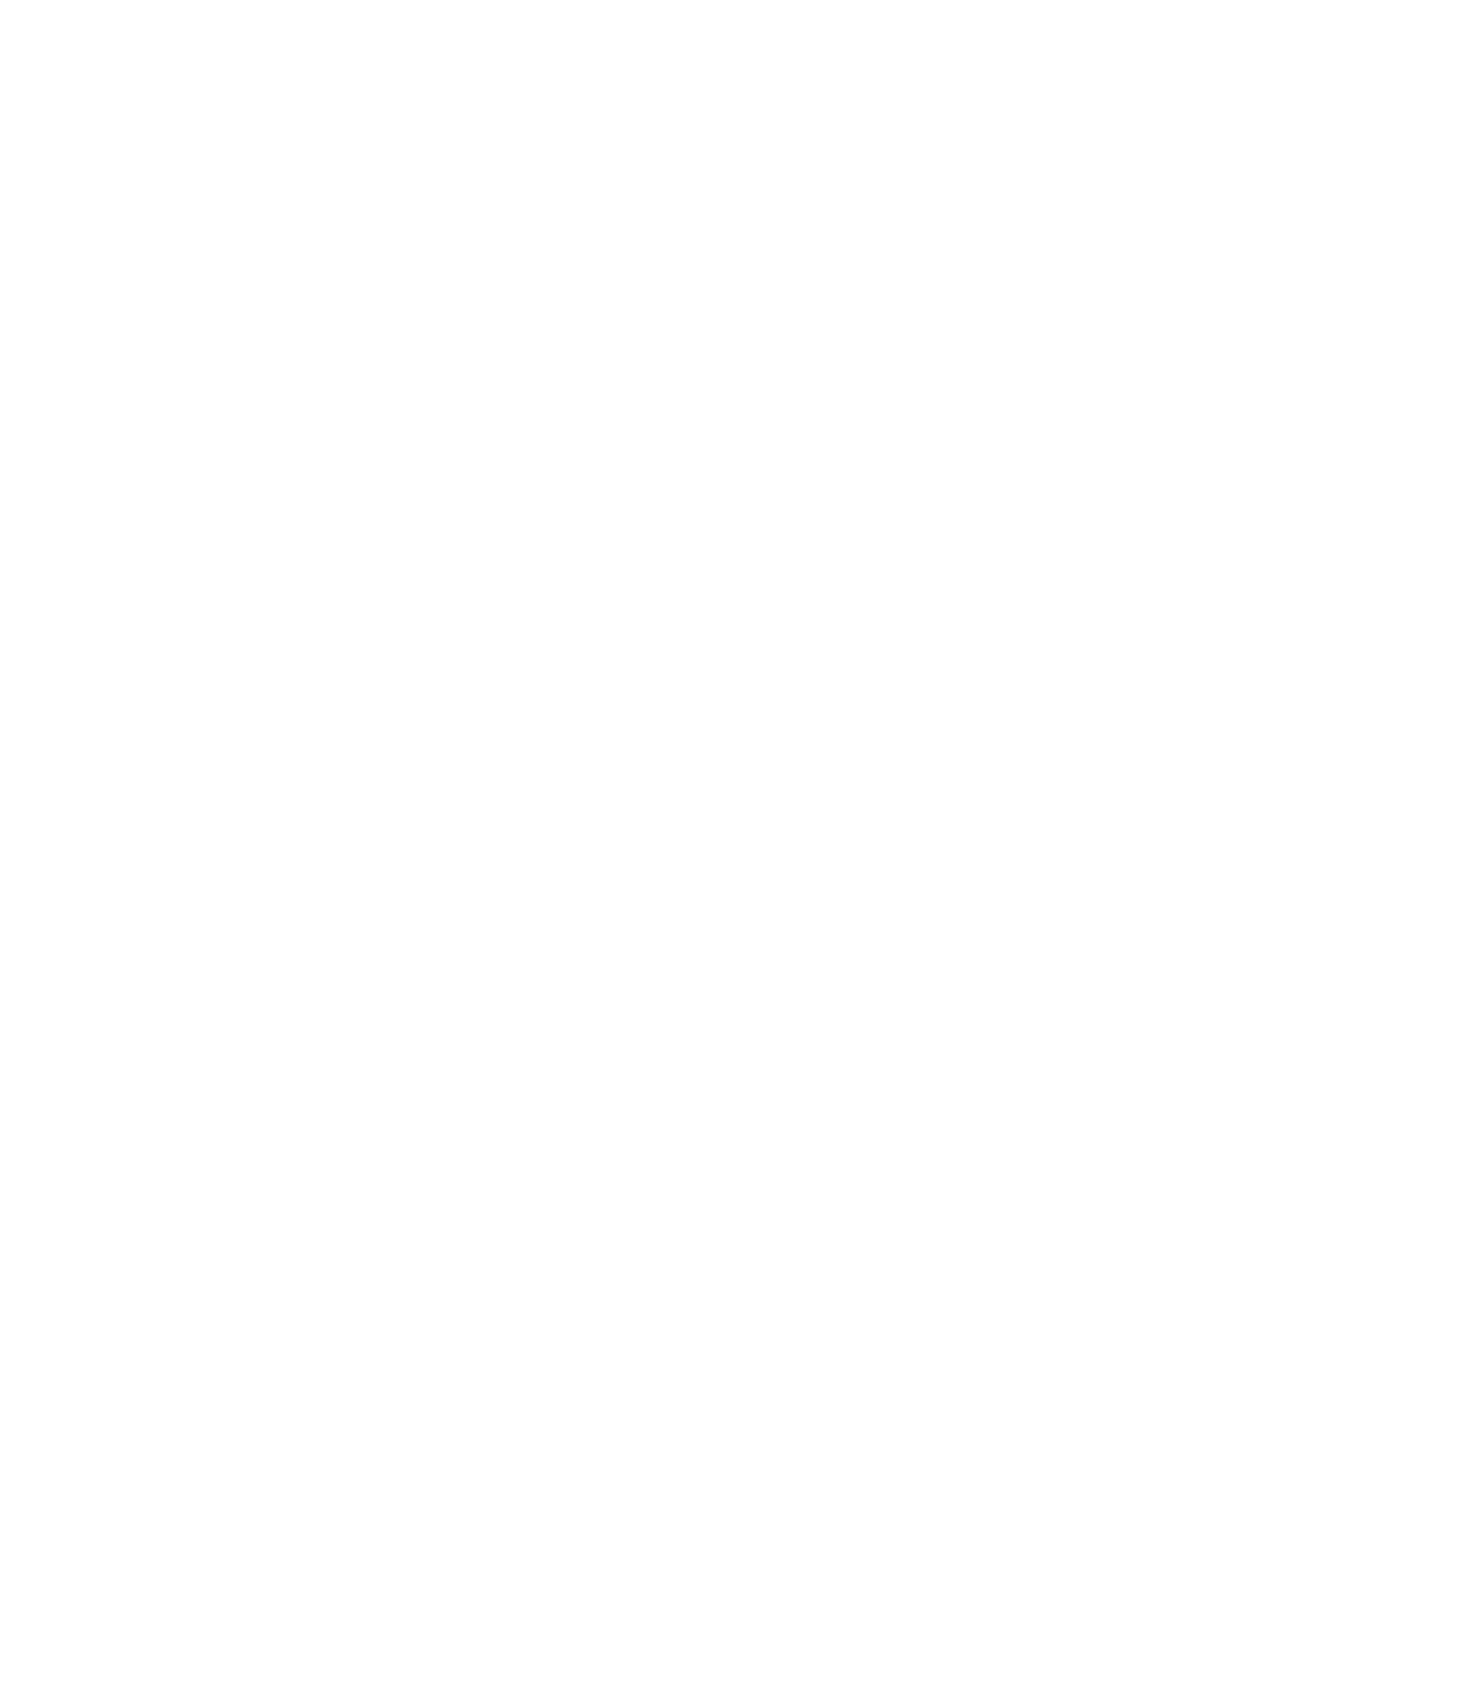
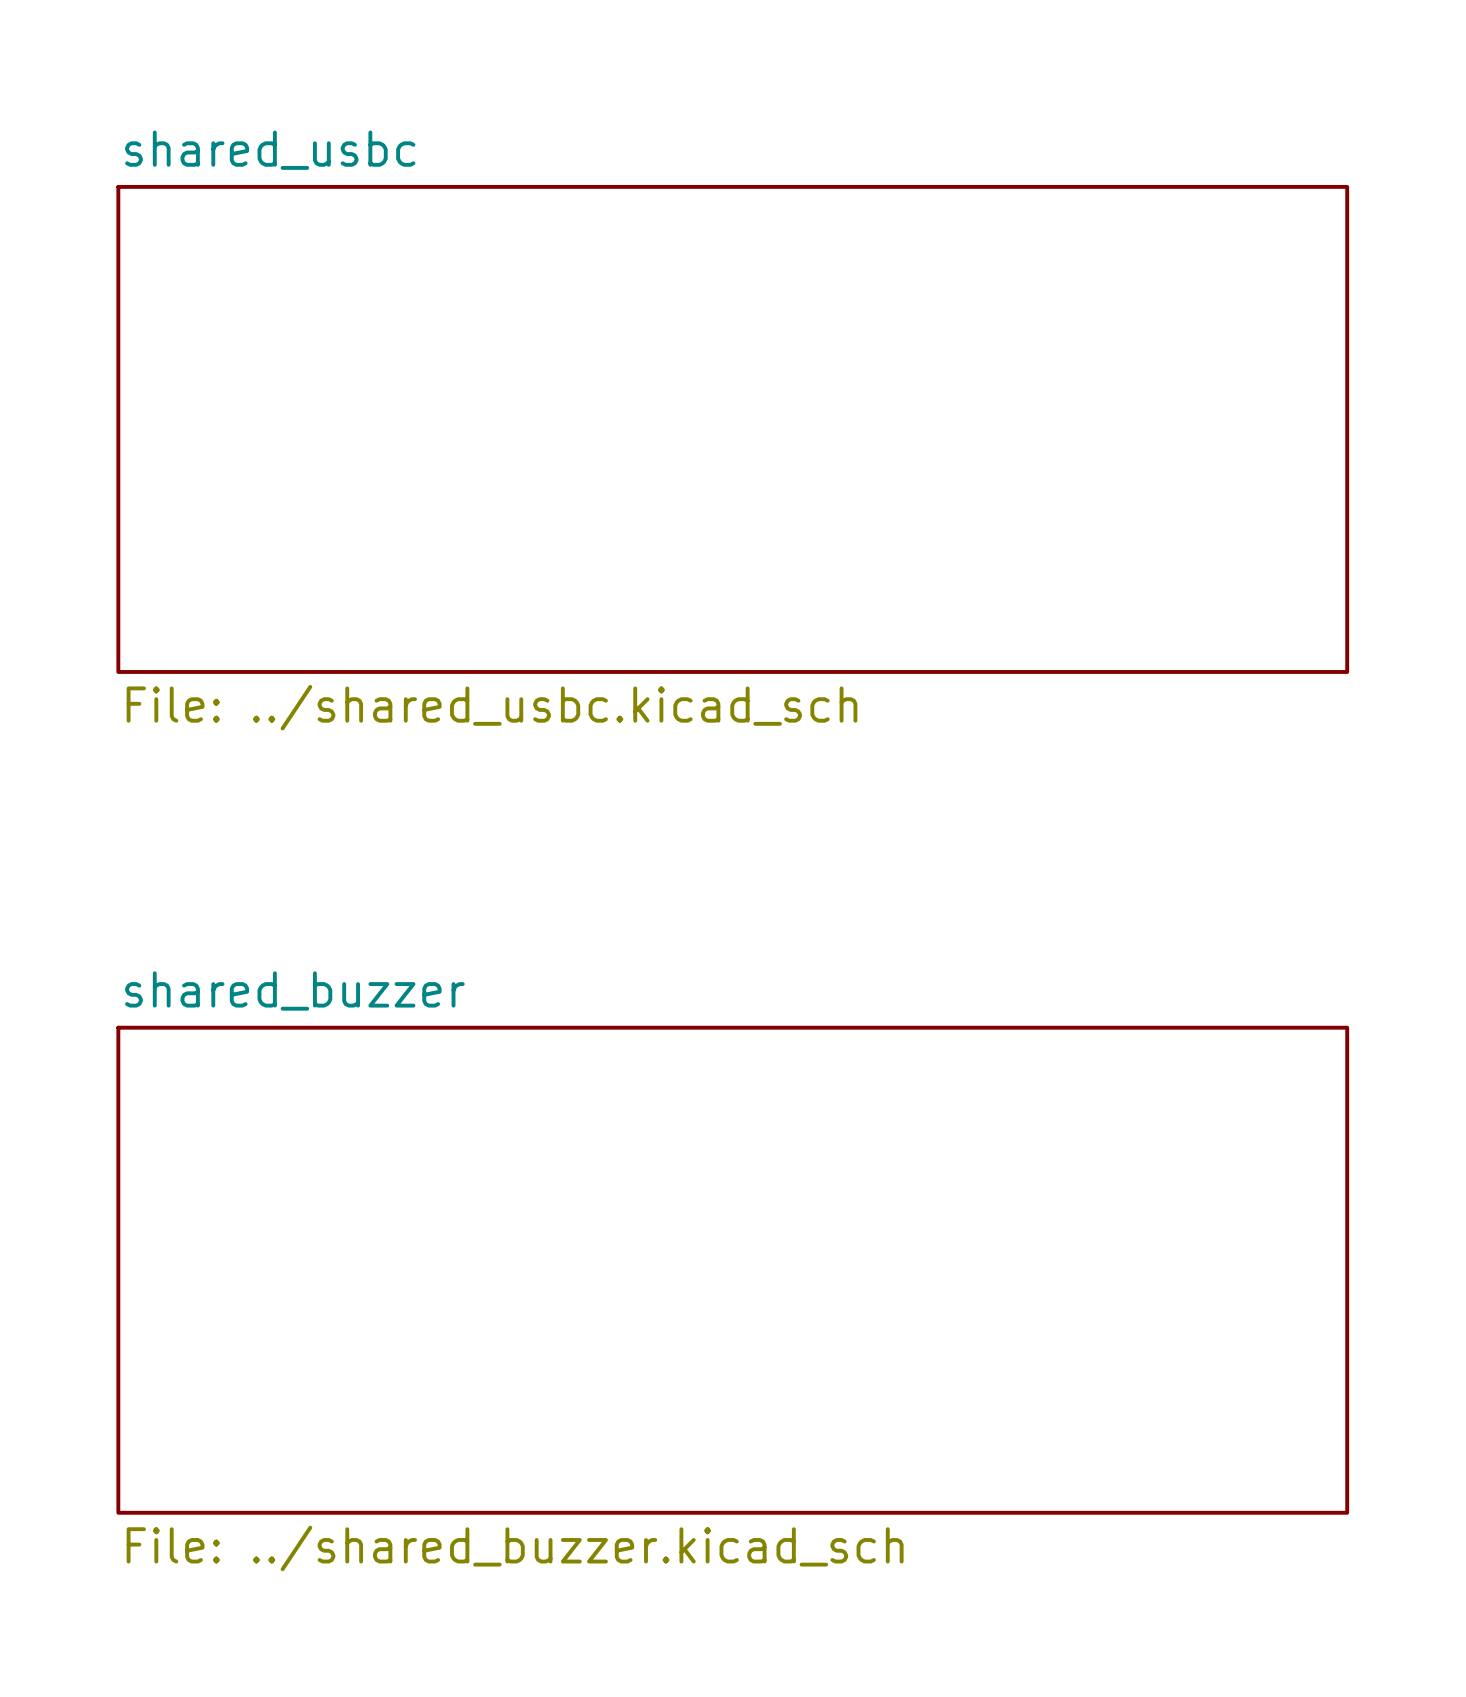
sheet shared_usbc: none -> File: ../shared_usbc.kicad_sch (732, 429)
sheet shared_buzzer: none -> File: ../shared_buzzer.kicad_sch (732, 1270)

